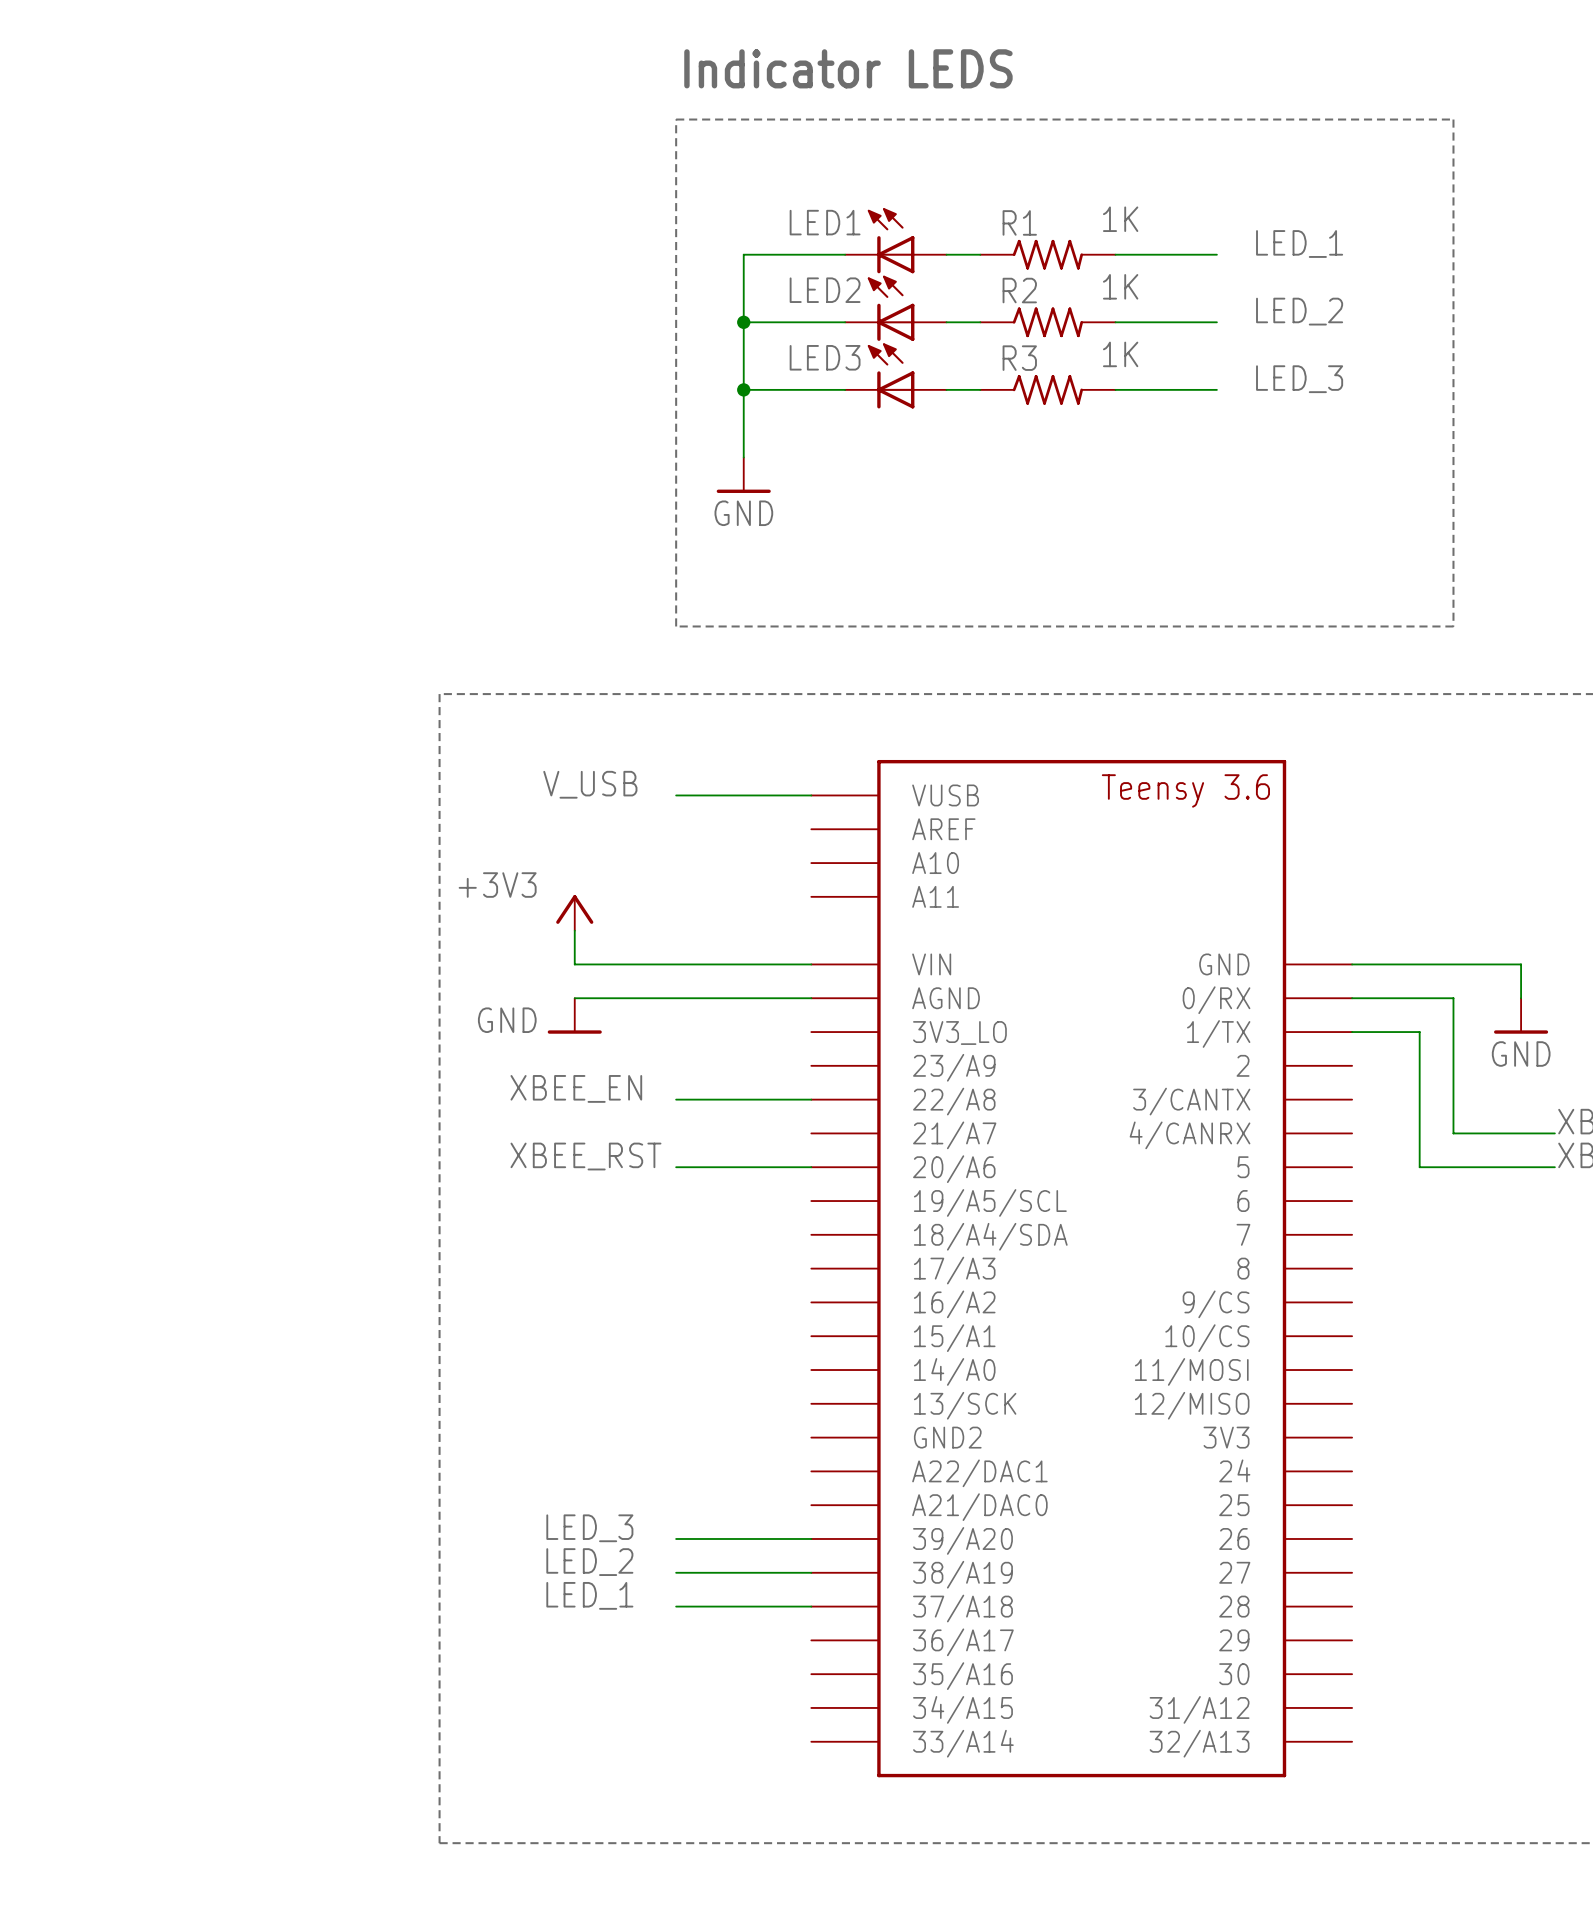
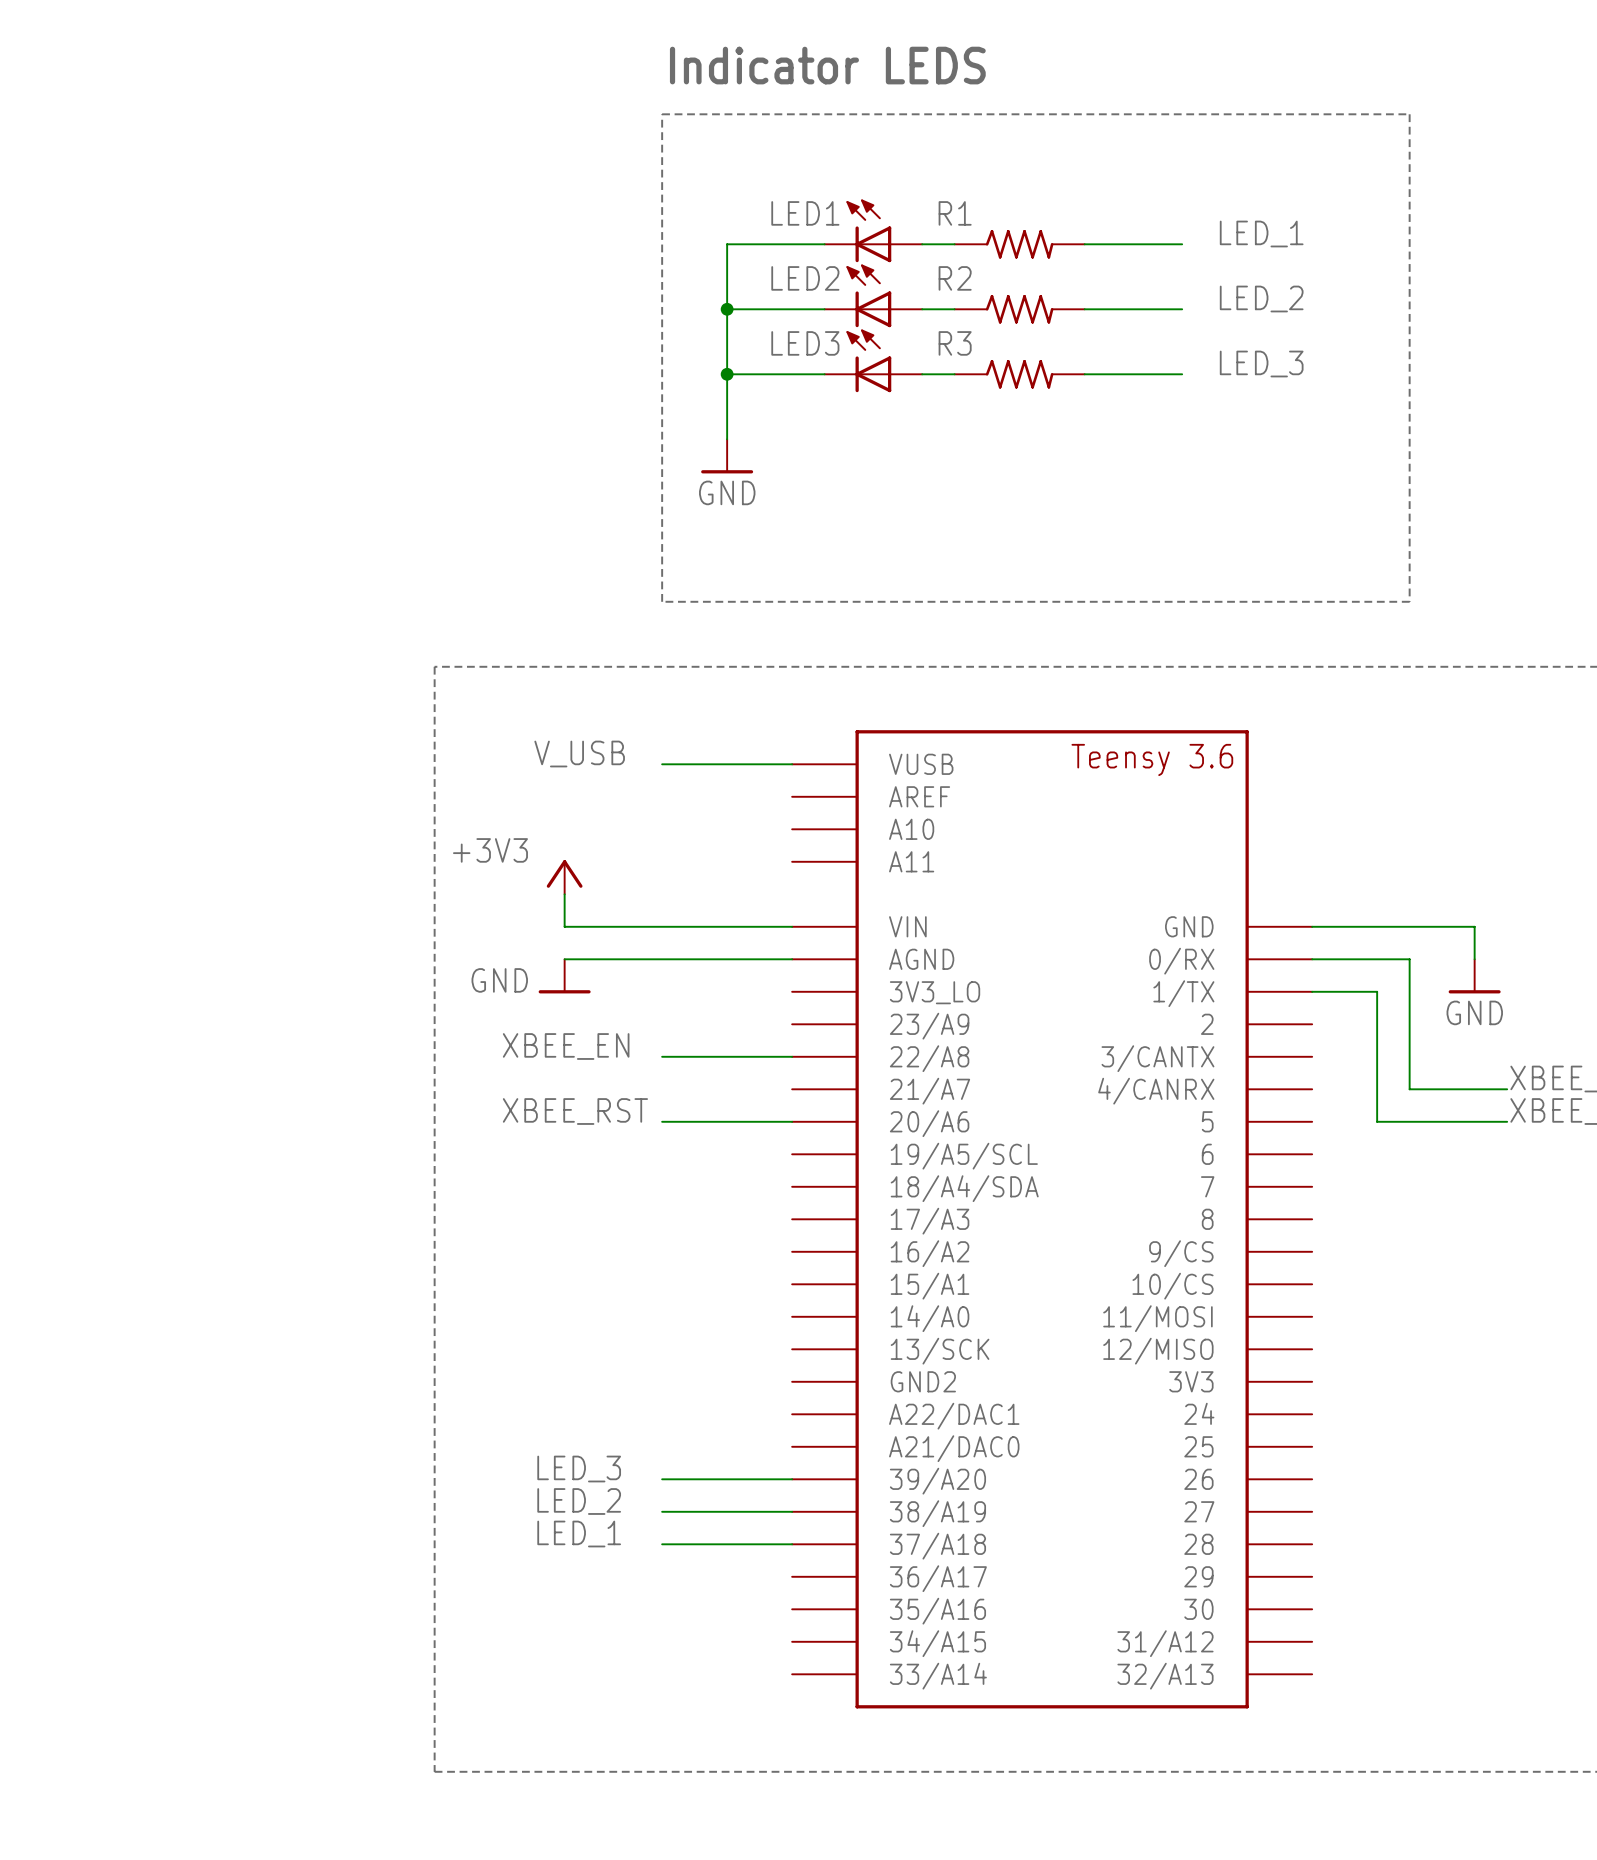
R1 value: 1K (1120, 219) -> none
R1 name position: R1 (1019, 222) -> R1 (955, 213)
R2 value: 1K (1120, 286) -> none
R2 name position: R2 (1019, 290) -> R2 (955, 278)
R3 value: 1K (1120, 354) -> none
R3 name position: R3 (1019, 358) -> R3 (955, 343)

